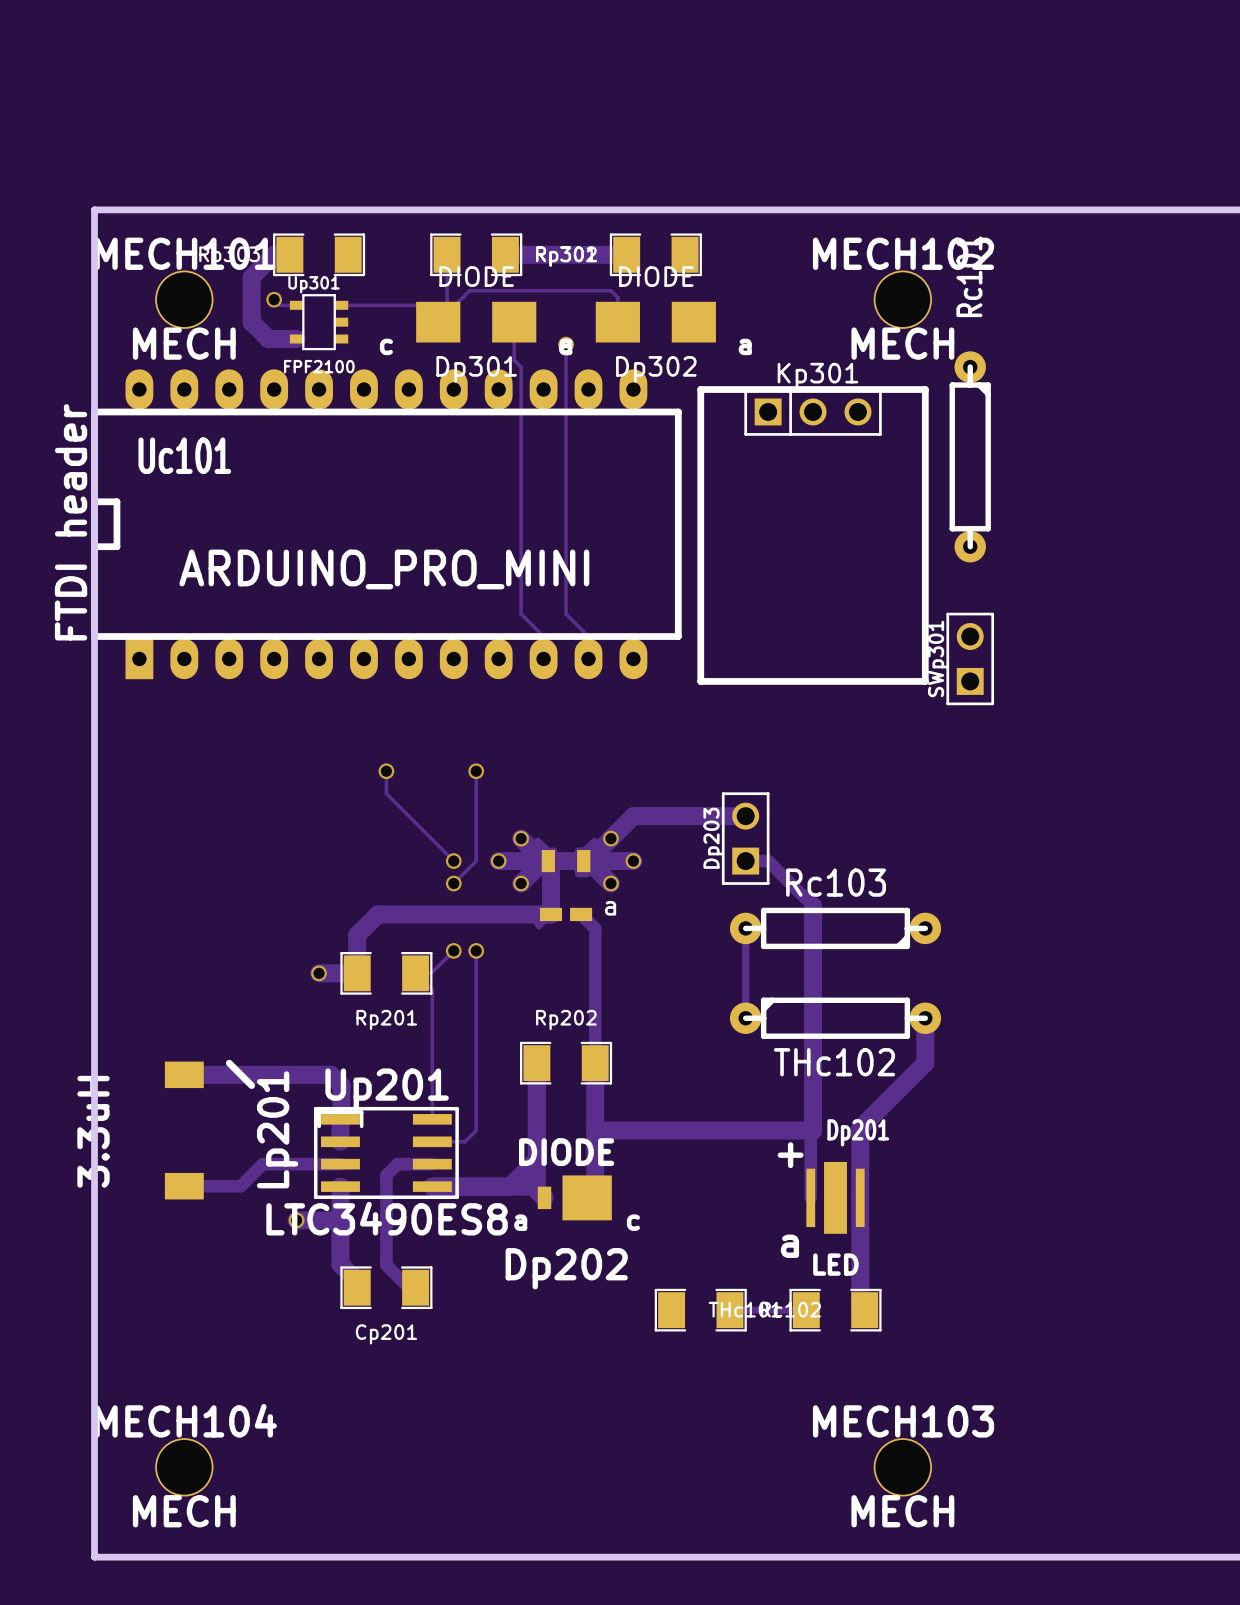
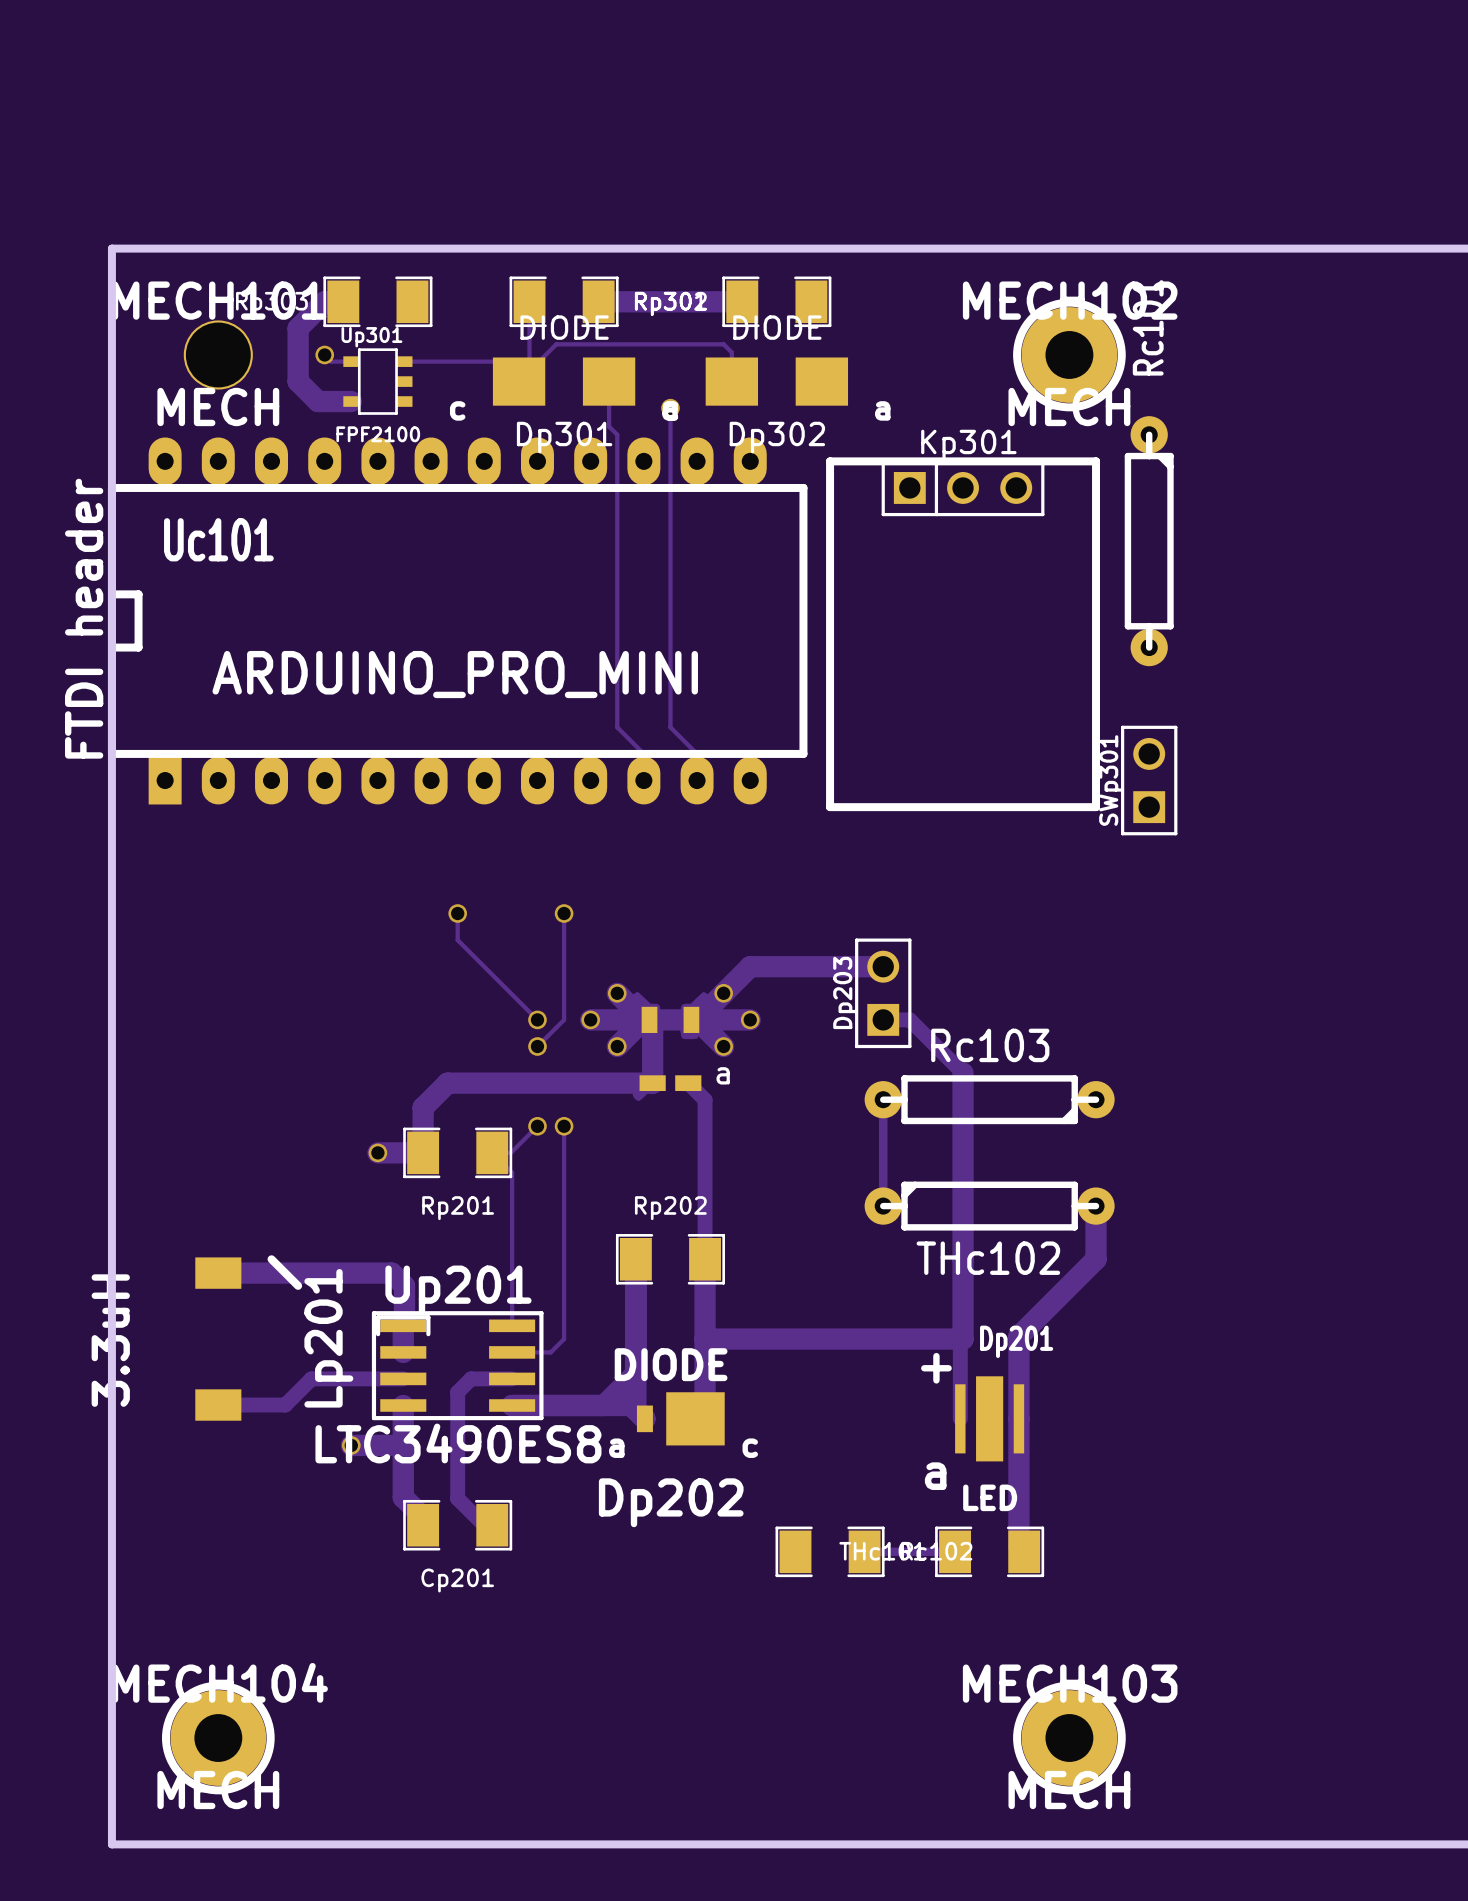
MECH102 footprint: [873, 270, 933, 329] -> [1013, 298, 1126, 412]
MECH104 footprint: [155, 1438, 214, 1497] -> [162, 1681, 275, 1795]
MECH103 footprint: [873, 1438, 933, 1497] -> [1013, 1681, 1126, 1795]

